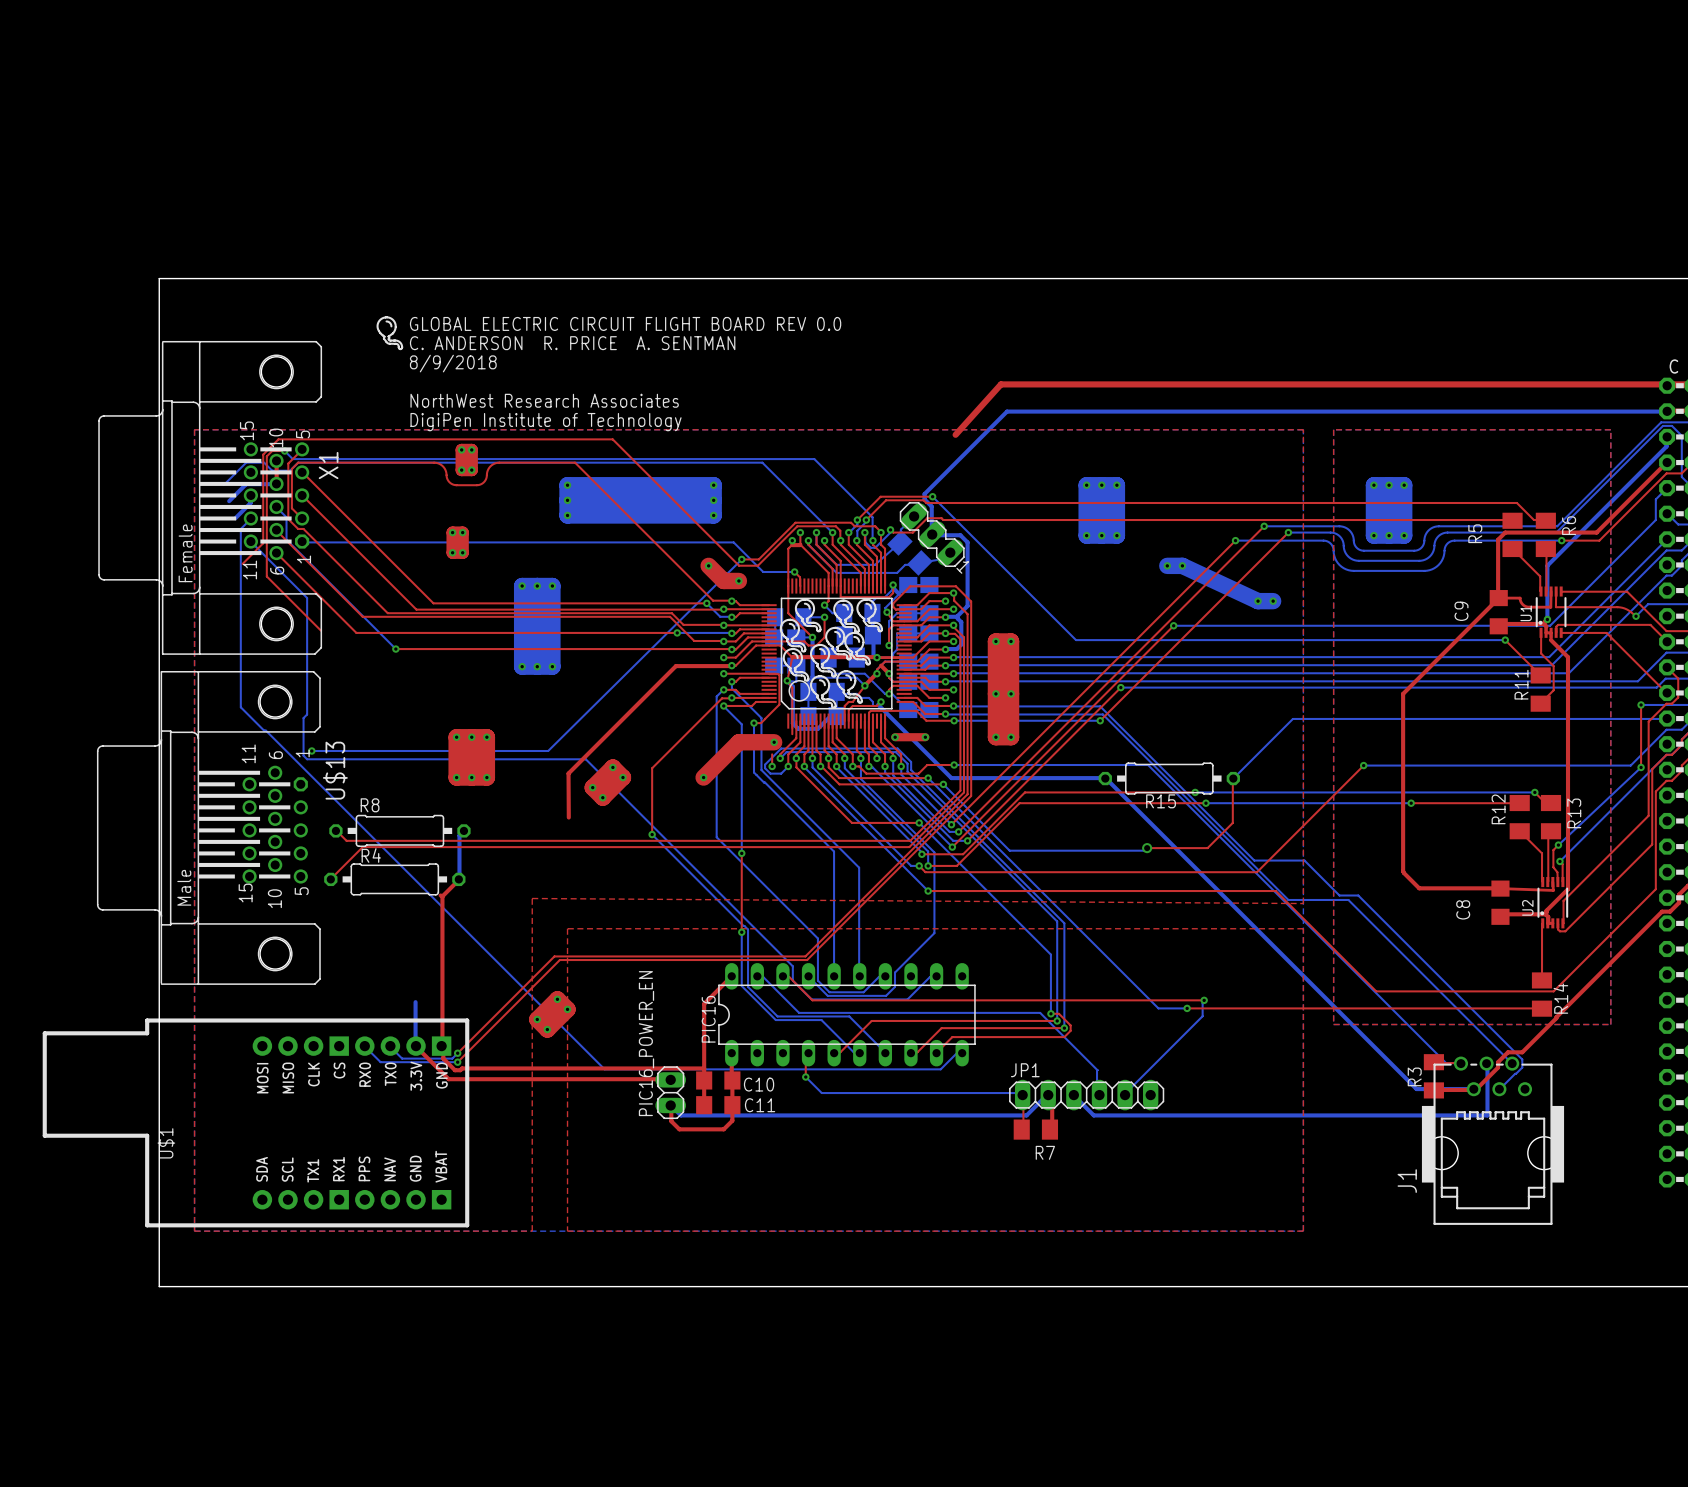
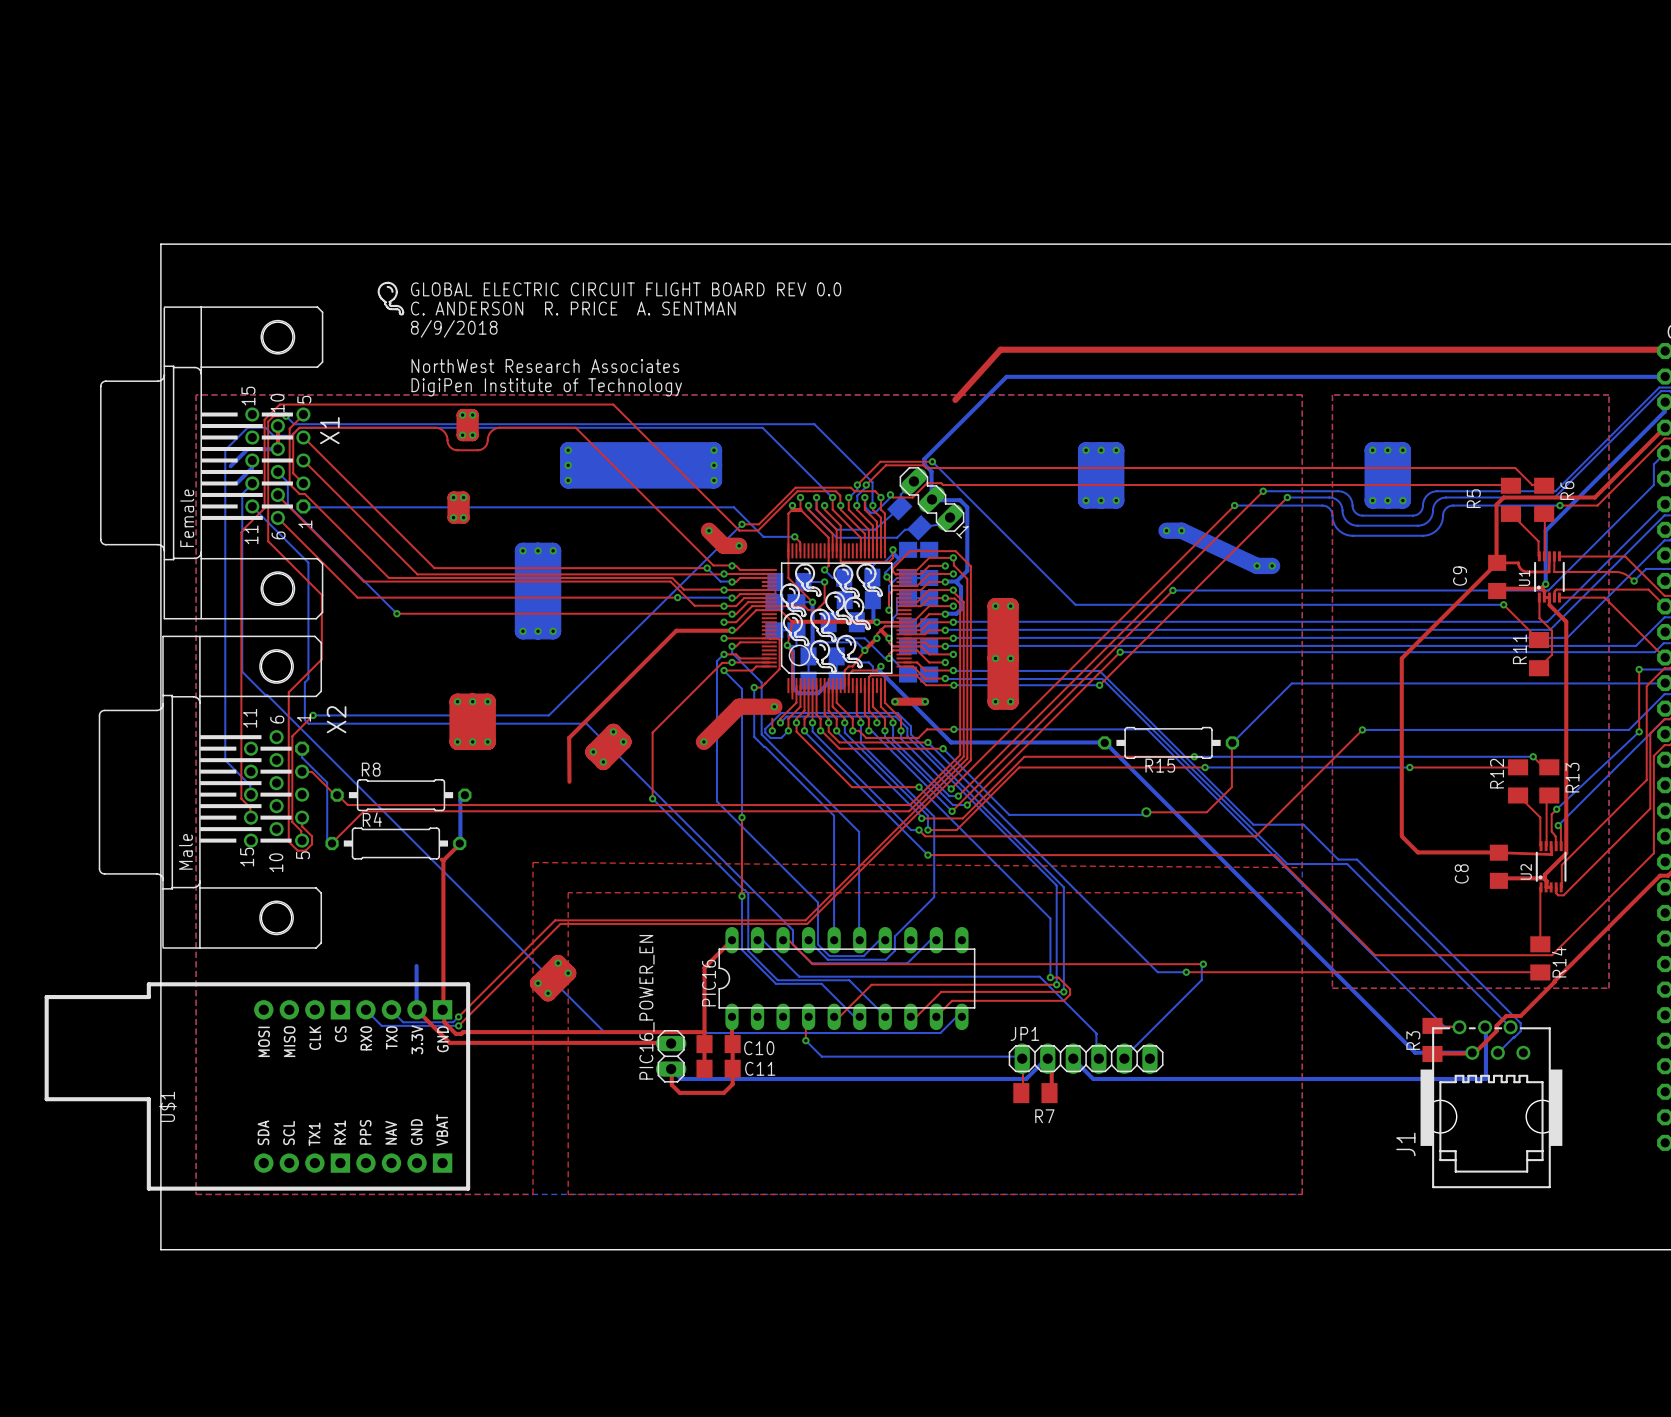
bottom track: none -> (225, 450) (225, 760) (250, 785) (251, 794)
top track: none -> (244, 528) (241, 532) (241, 798) (250, 807) (251, 817)
top track: none -> (322, 595) (321, 659) (288, 692) (288, 841) (297, 850) (305, 850) (312, 844) (312, 836) (302, 826) (302, 817)
top track: none -> (313, 715) (292, 736) (292, 822) (301, 830) (302, 840)
U$13 name: U$13 (335, 770) -> X2 (336, 719)
bottom track: none -> (302, 748) (302, 757) (327, 782) (327, 839) (332, 843)
top track: none -> (302, 771) (312, 771) (337, 795)

